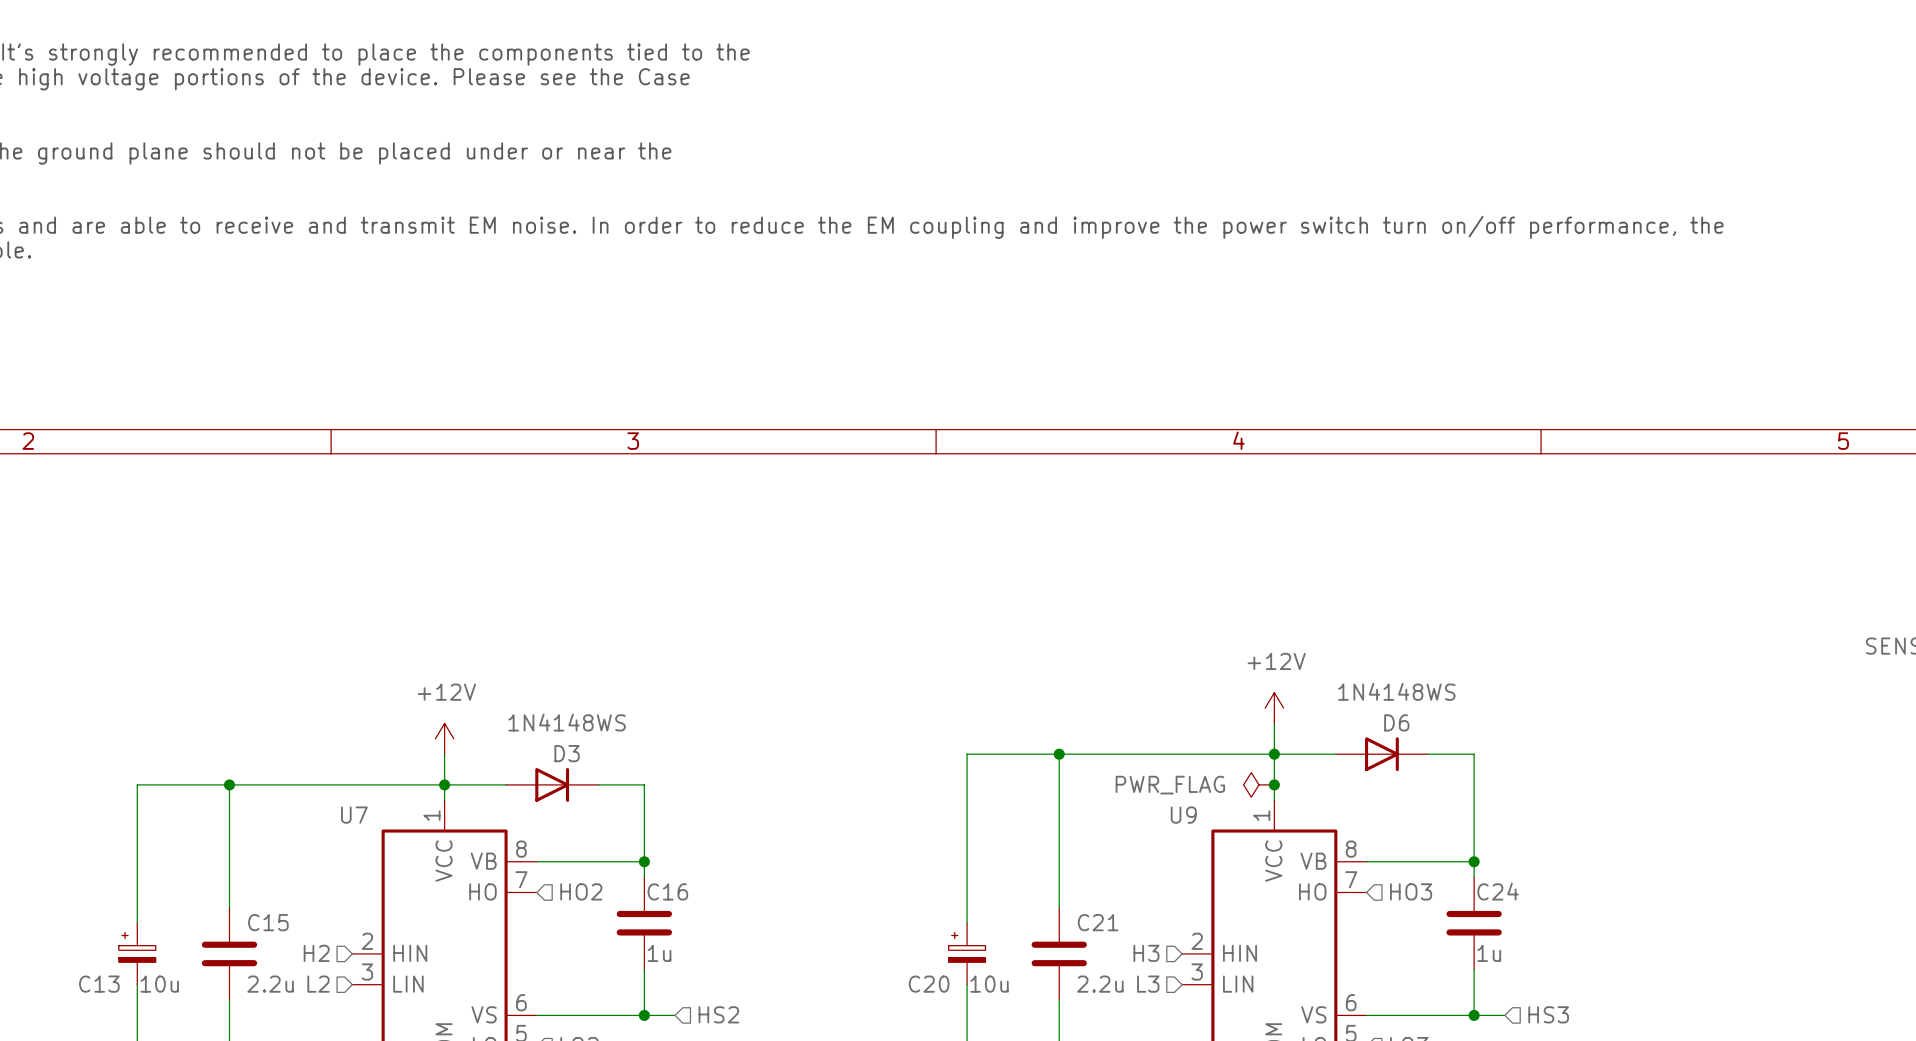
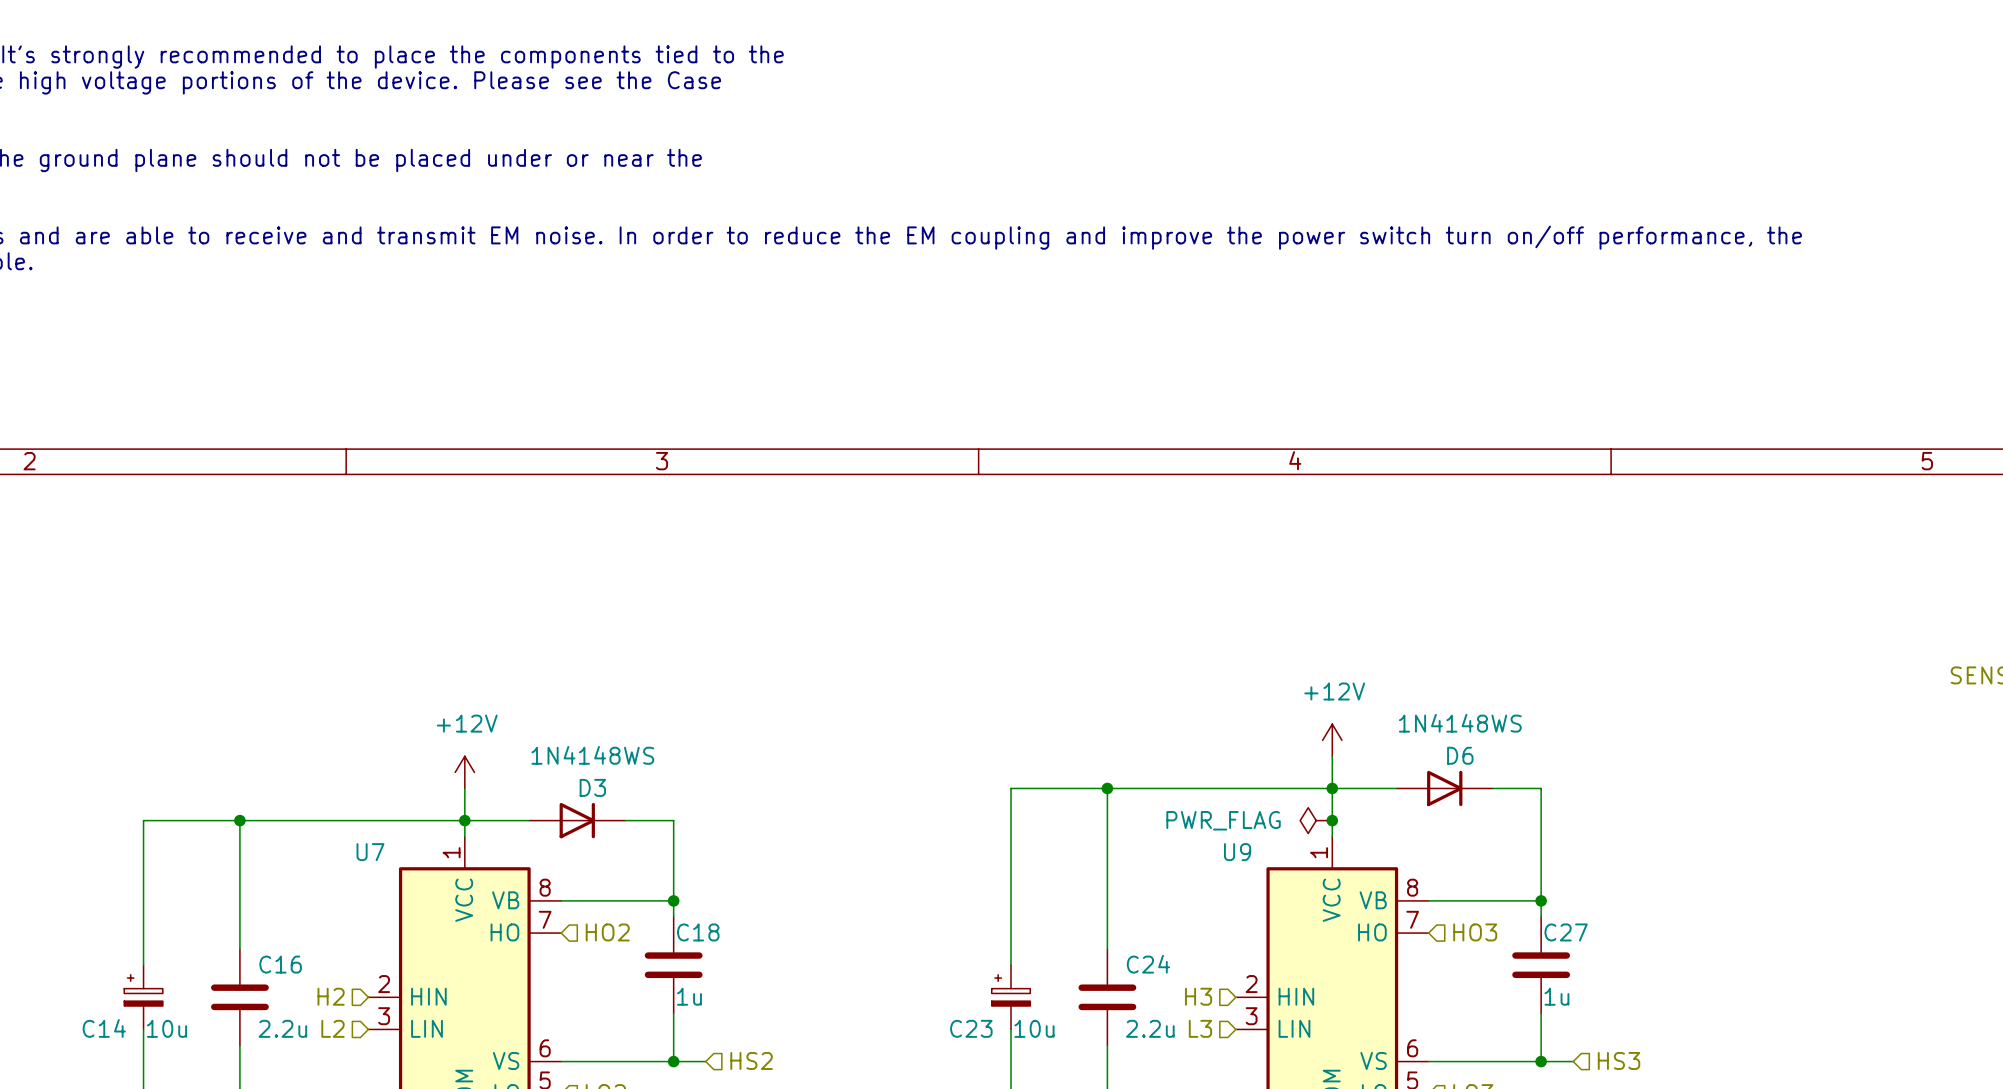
C16 name: C16 (667, 891) -> C18 (698, 932)
C24 name: C24 (1498, 891) -> C27 (1566, 932)
C15 name: C15 (268, 922) -> C16 (280, 964)
C21 name: C21 (1098, 922) -> C24 (1148, 964)
C13 name: C13 (99, 984) -> C14 (104, 1028)
C20 name: C20 (929, 984) -> C23 (971, 1028)

